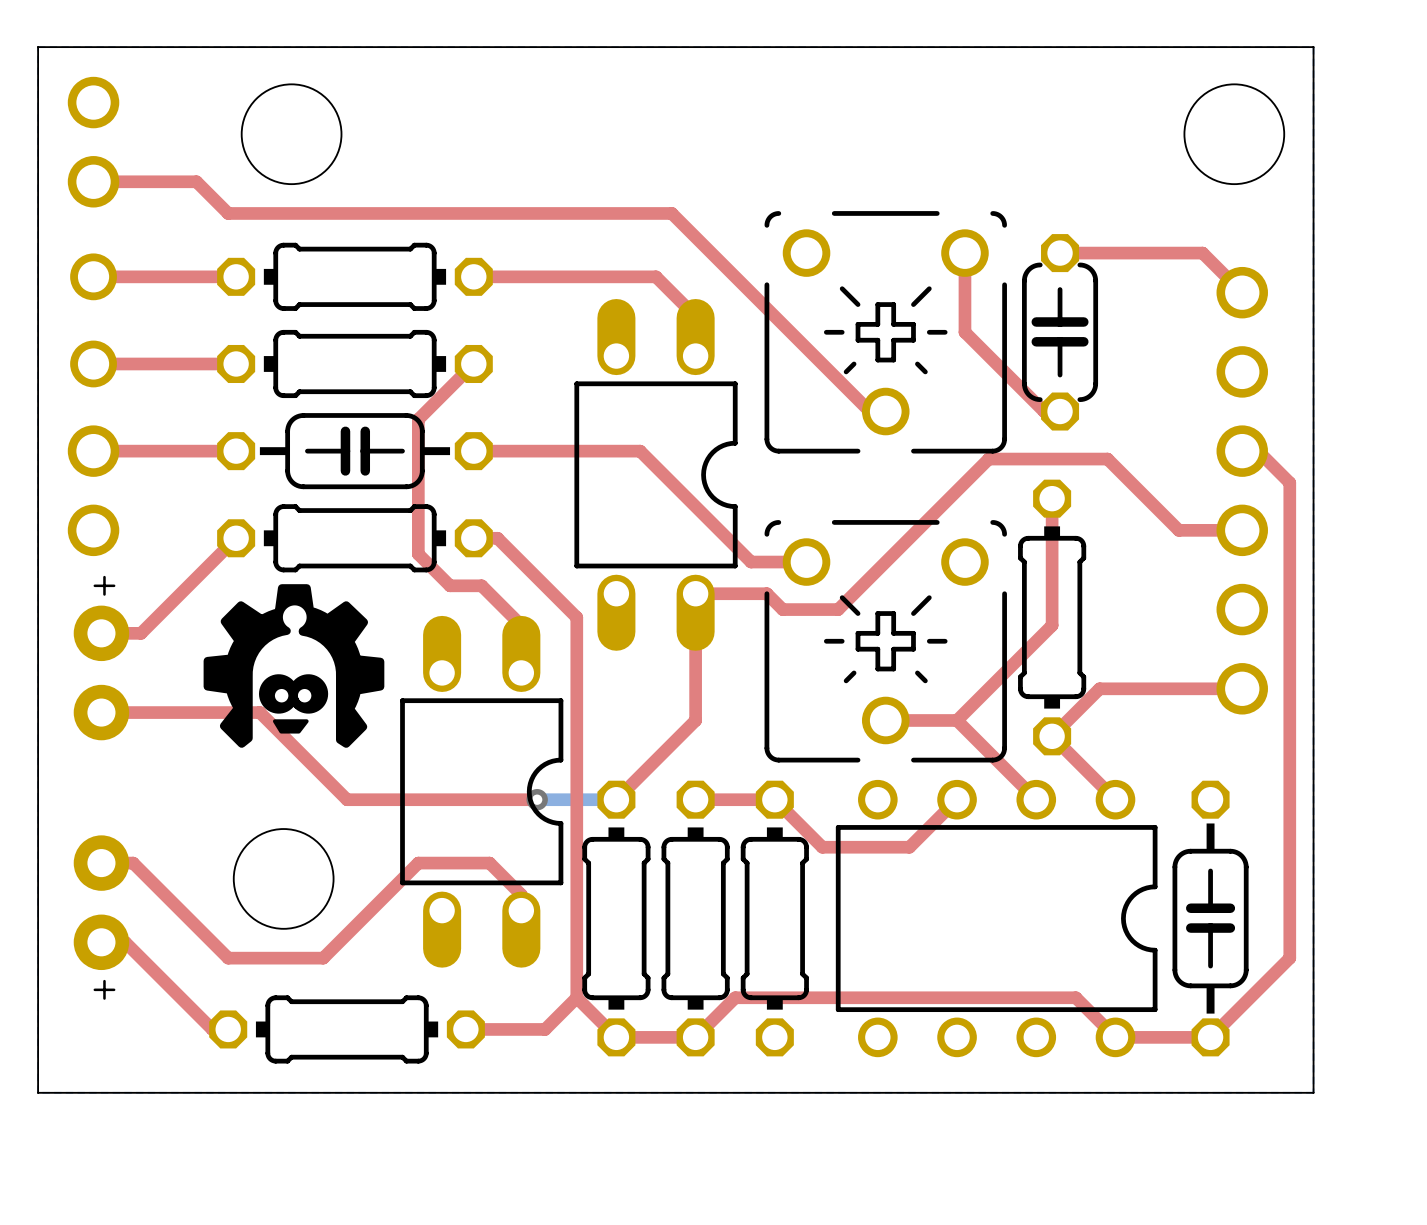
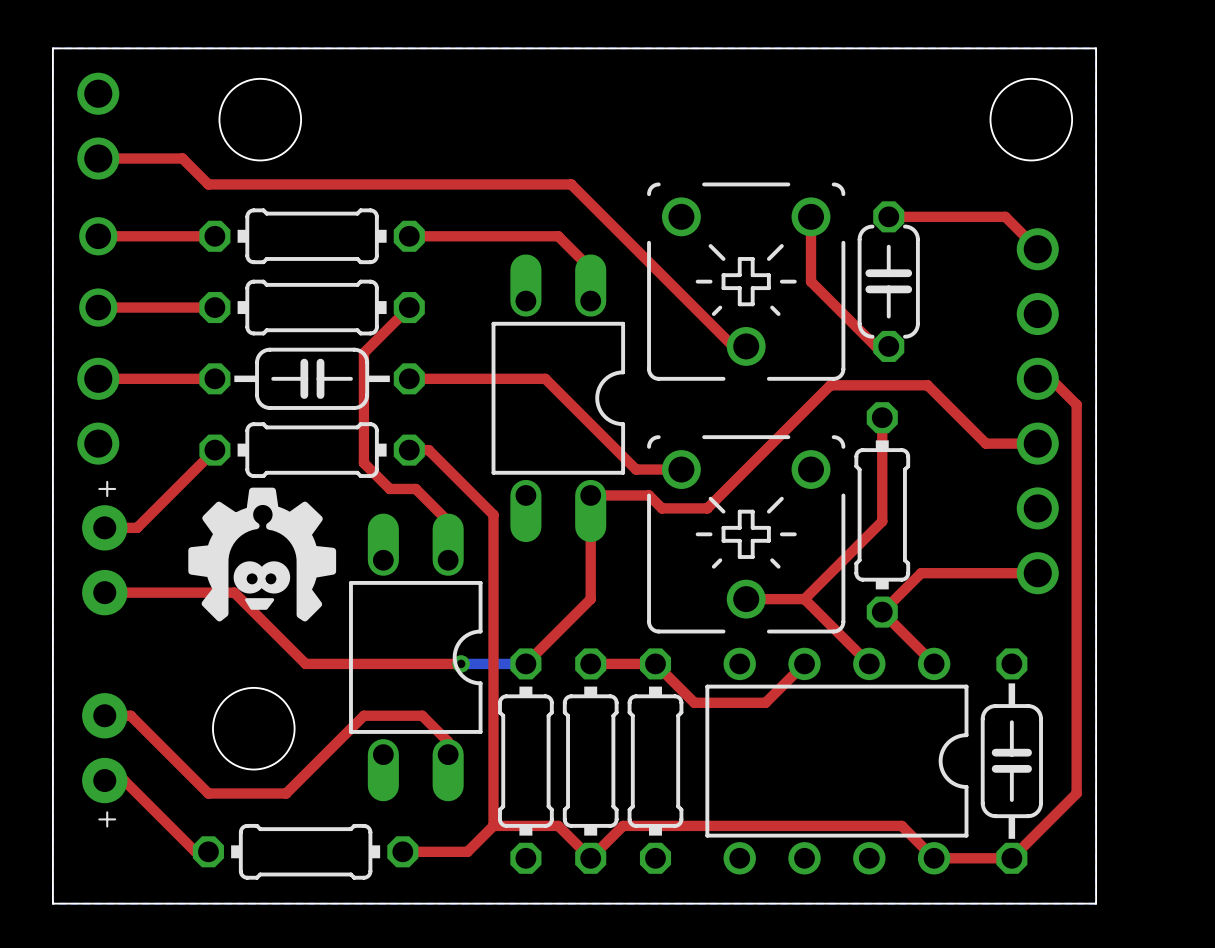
top track: (576, 997) (616, 1037) (695, 1037) -> (493, 825) (558, 825) (590, 858)

